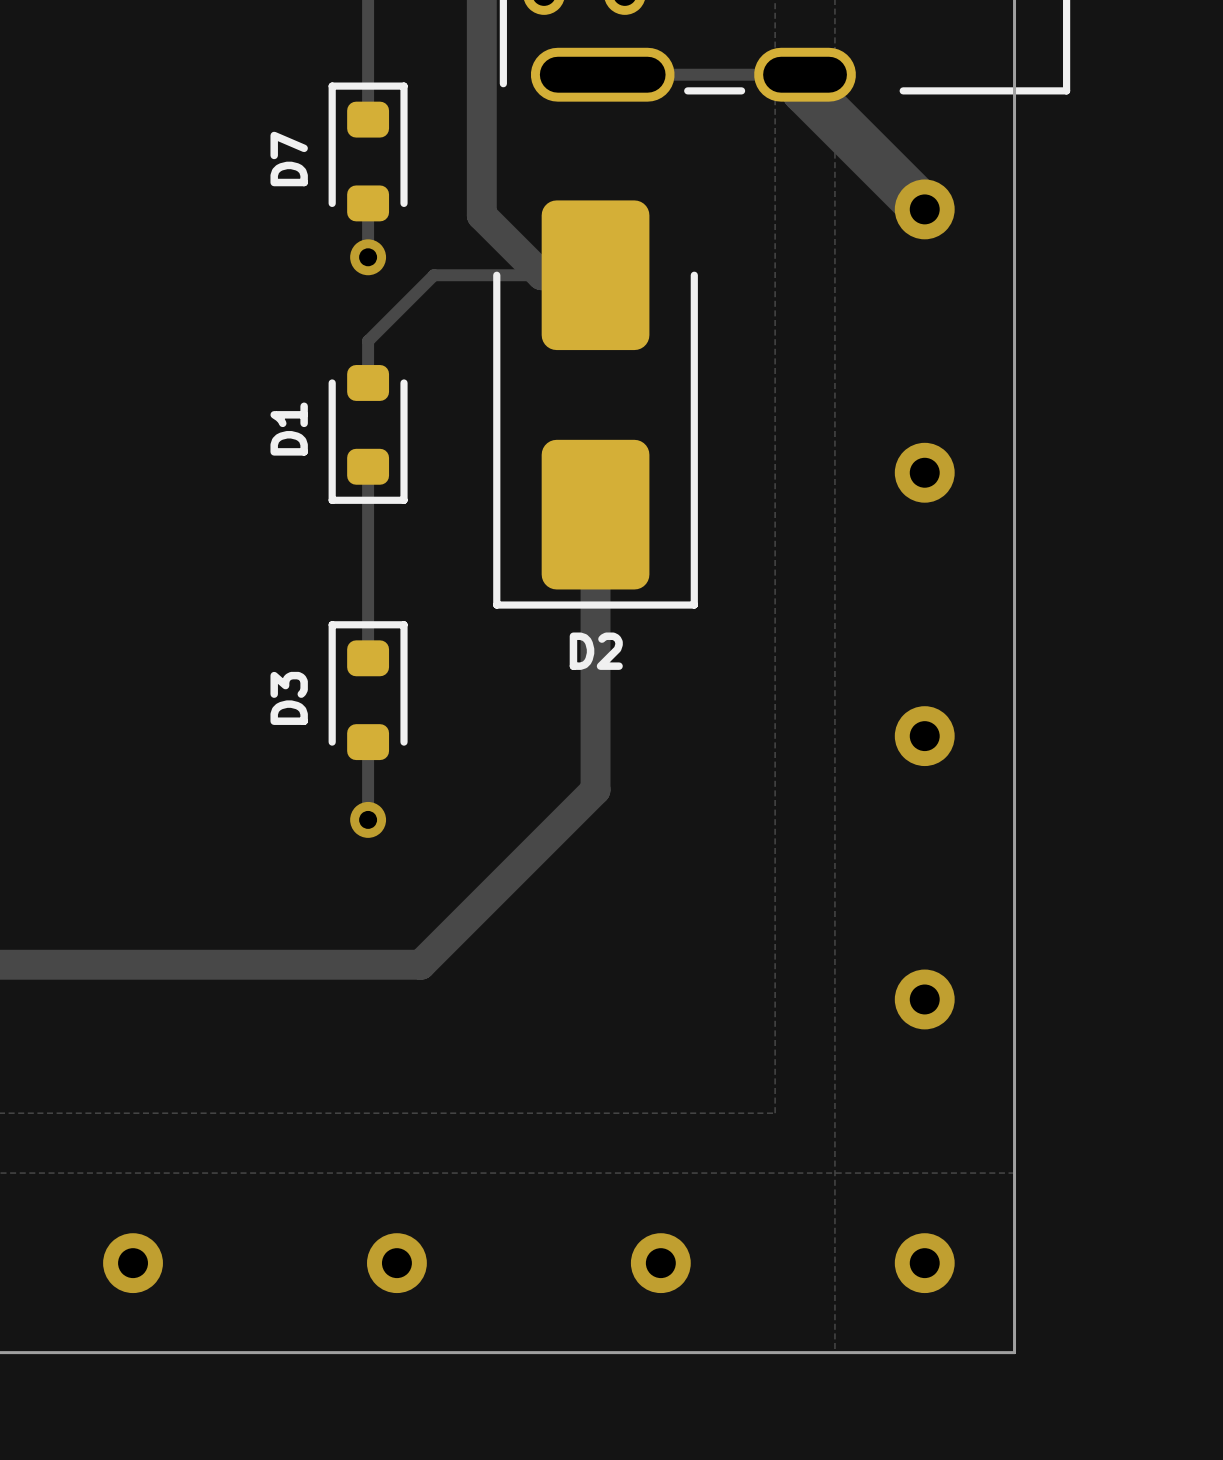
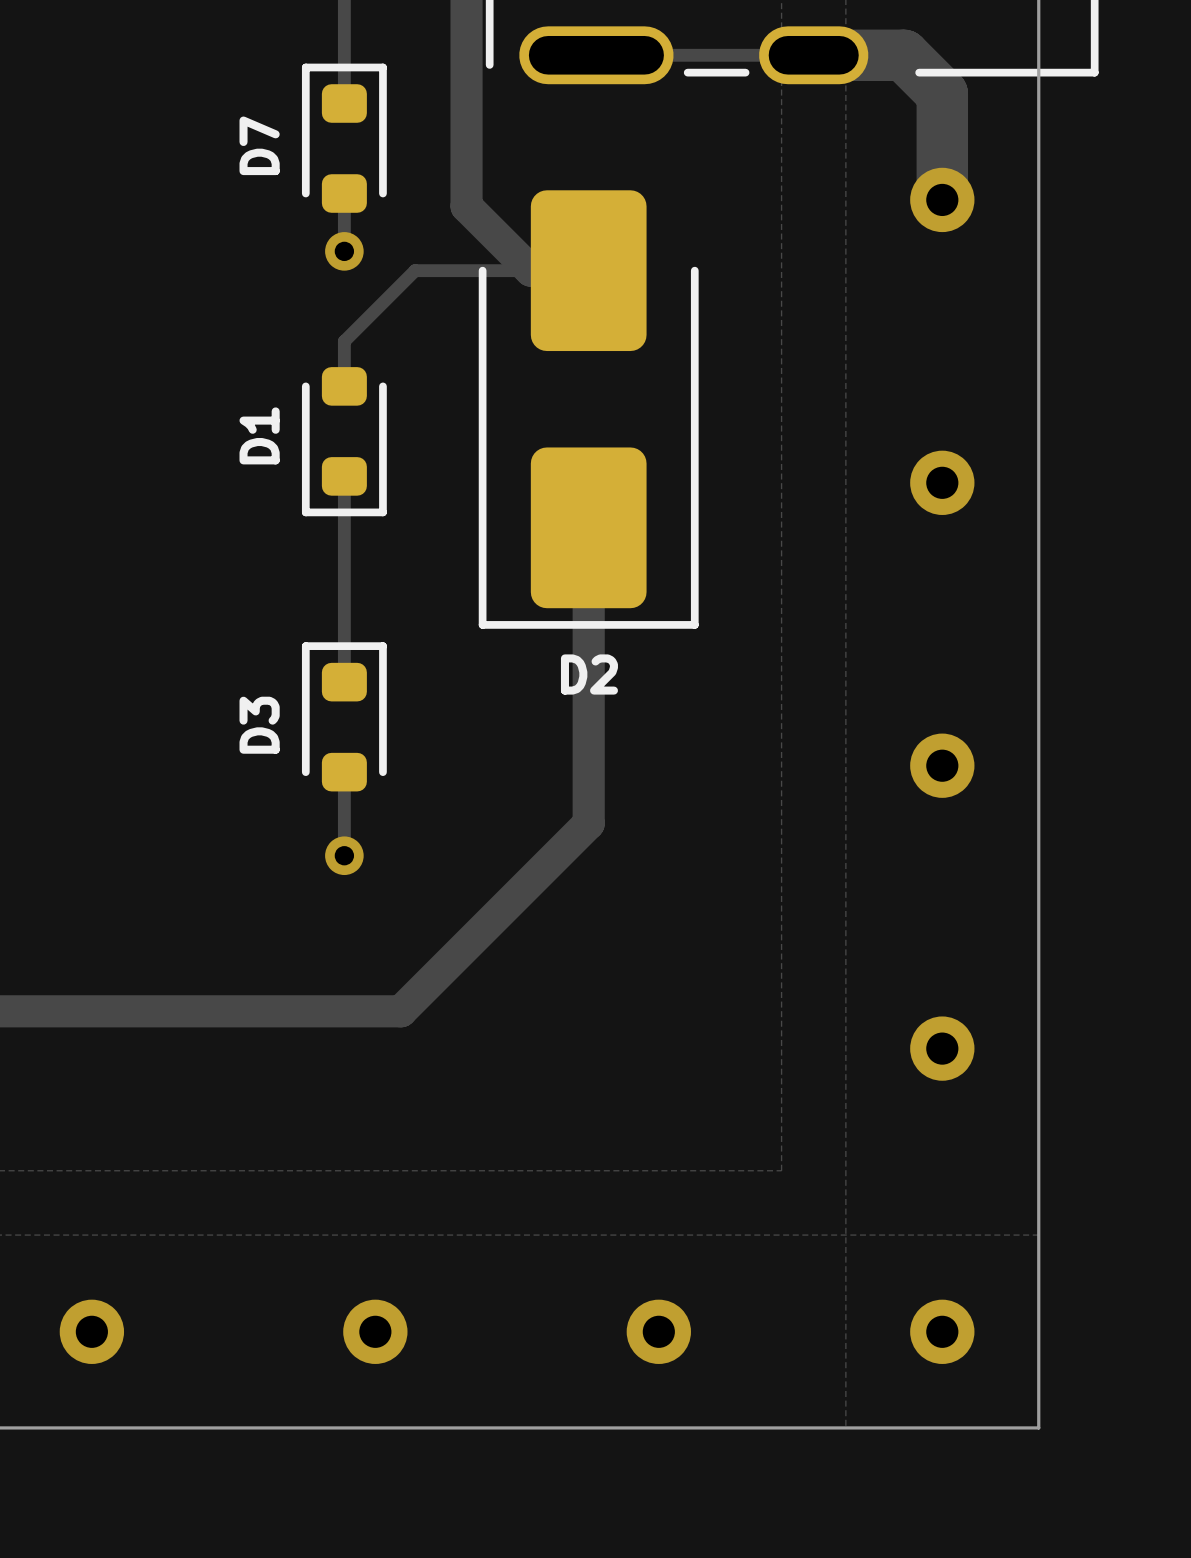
track: (805, 74) (805, 89) (924, 209) -> (813, 55) (903, 55) (942, 93) (942, 199)

